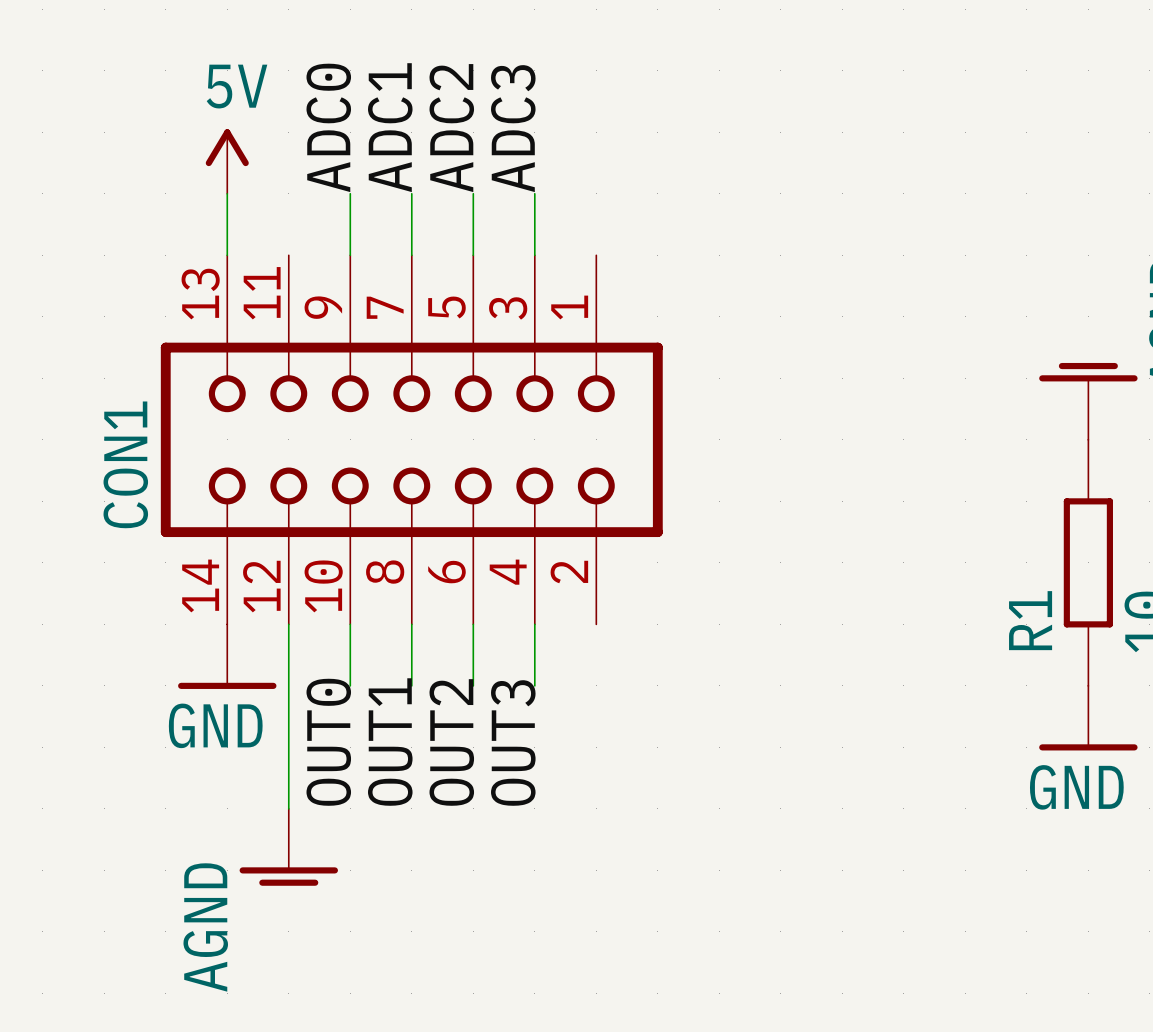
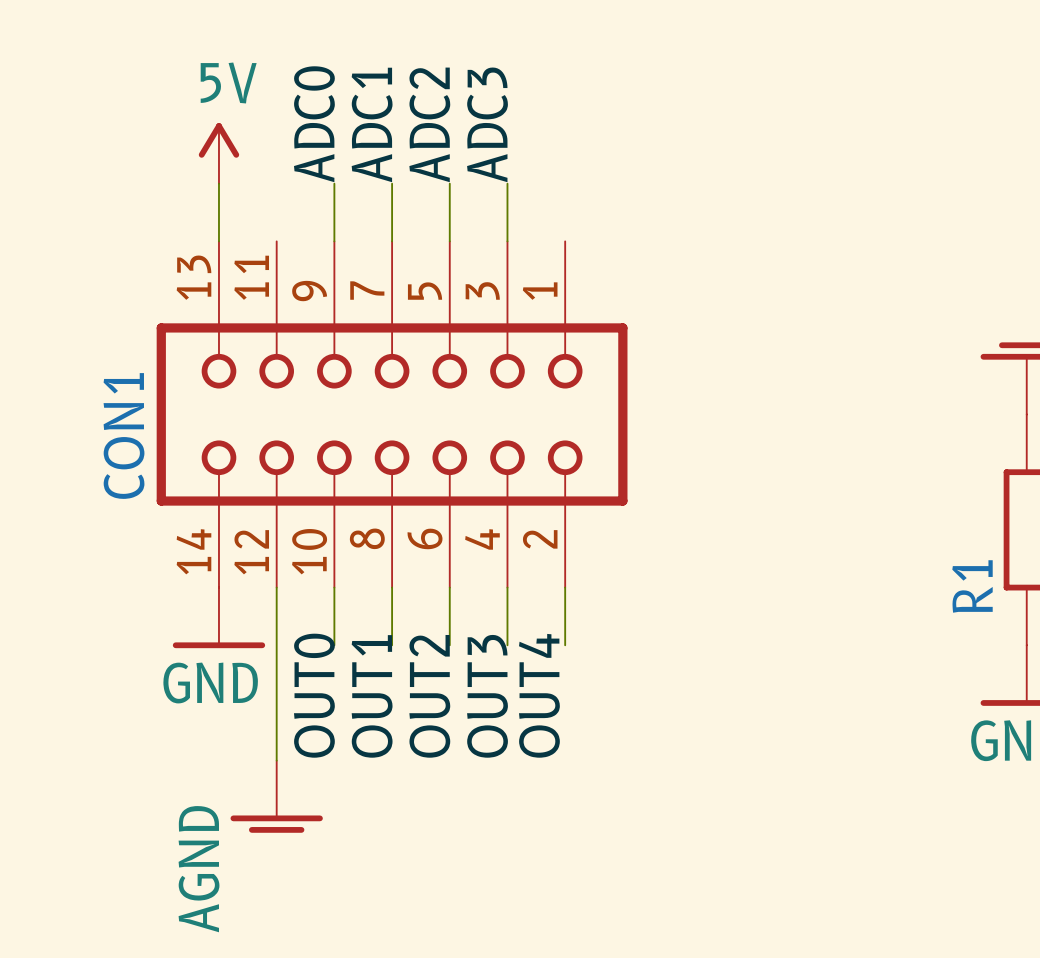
wire: none -> (565, 587) (565, 645)
label: none -> OUT4 (539, 695)

